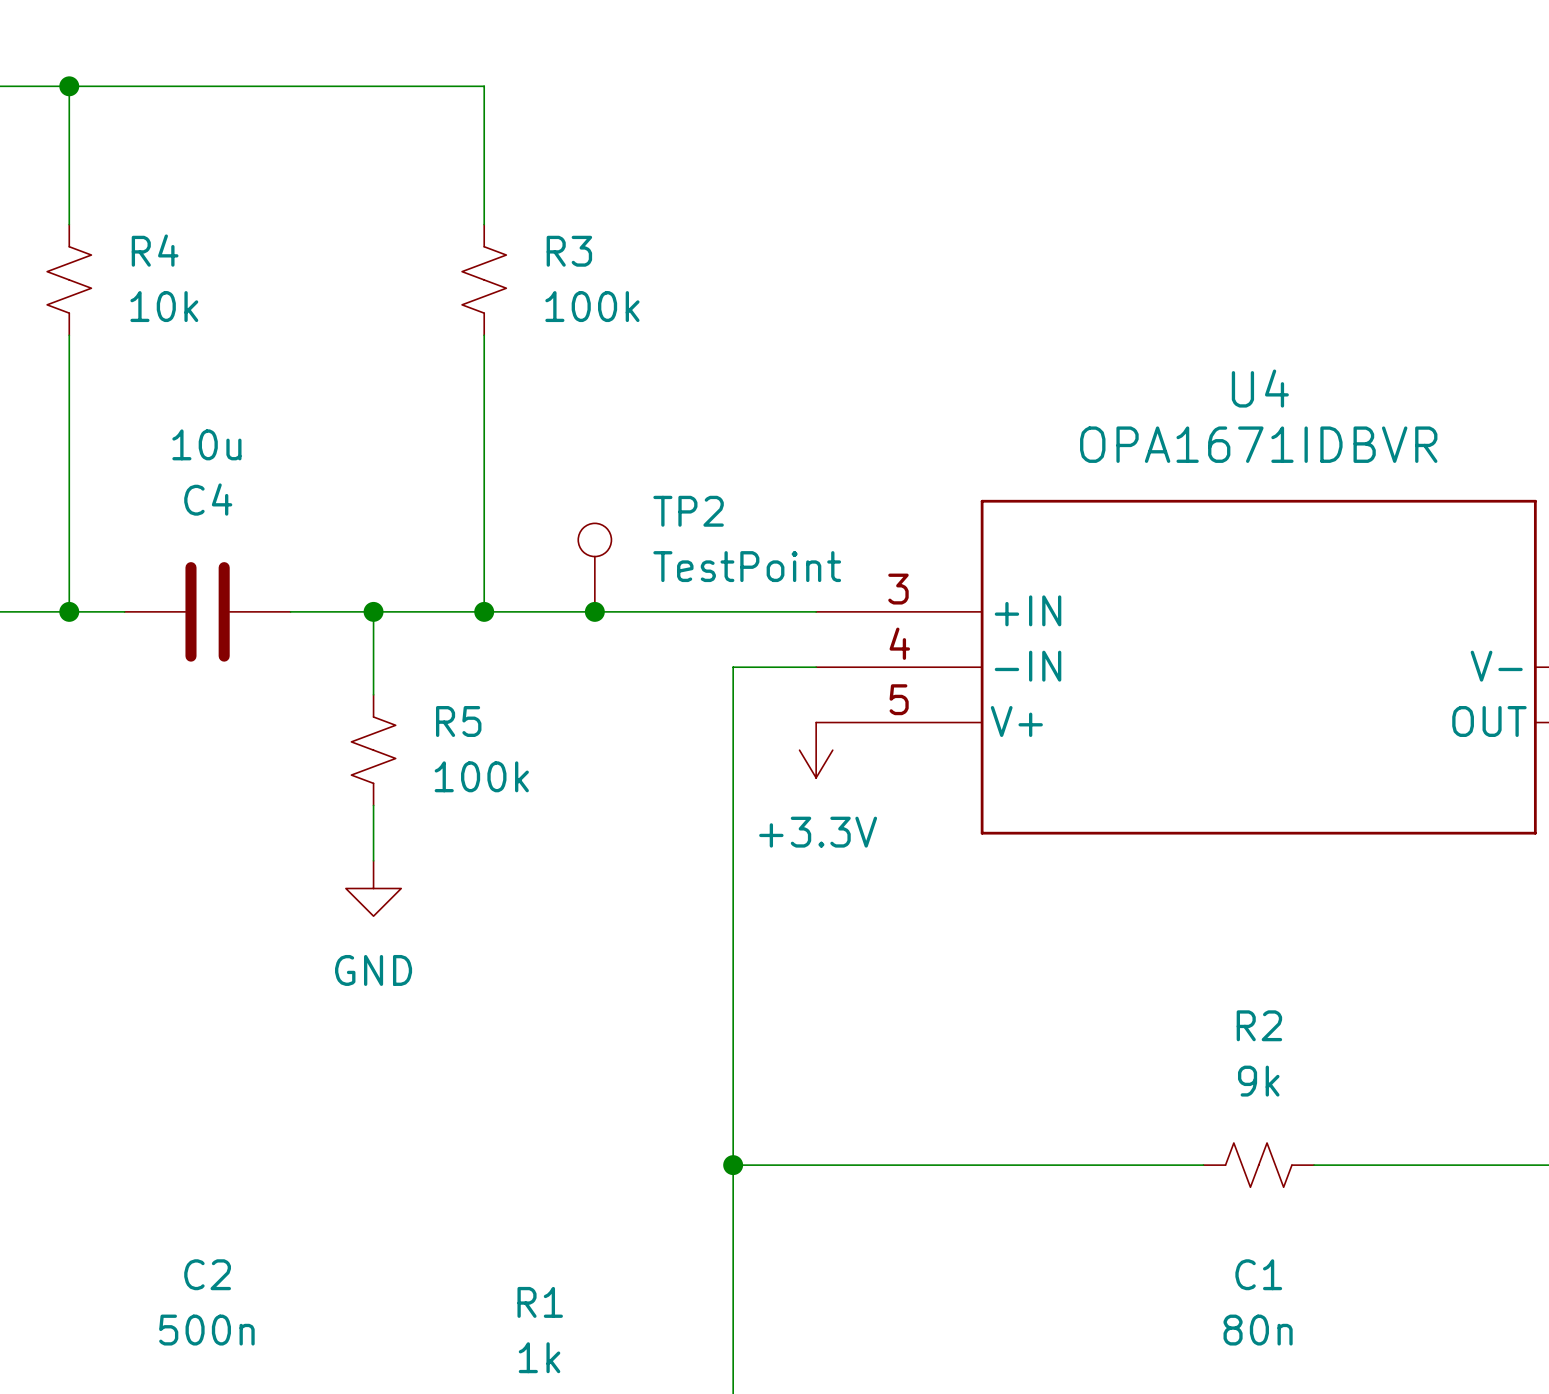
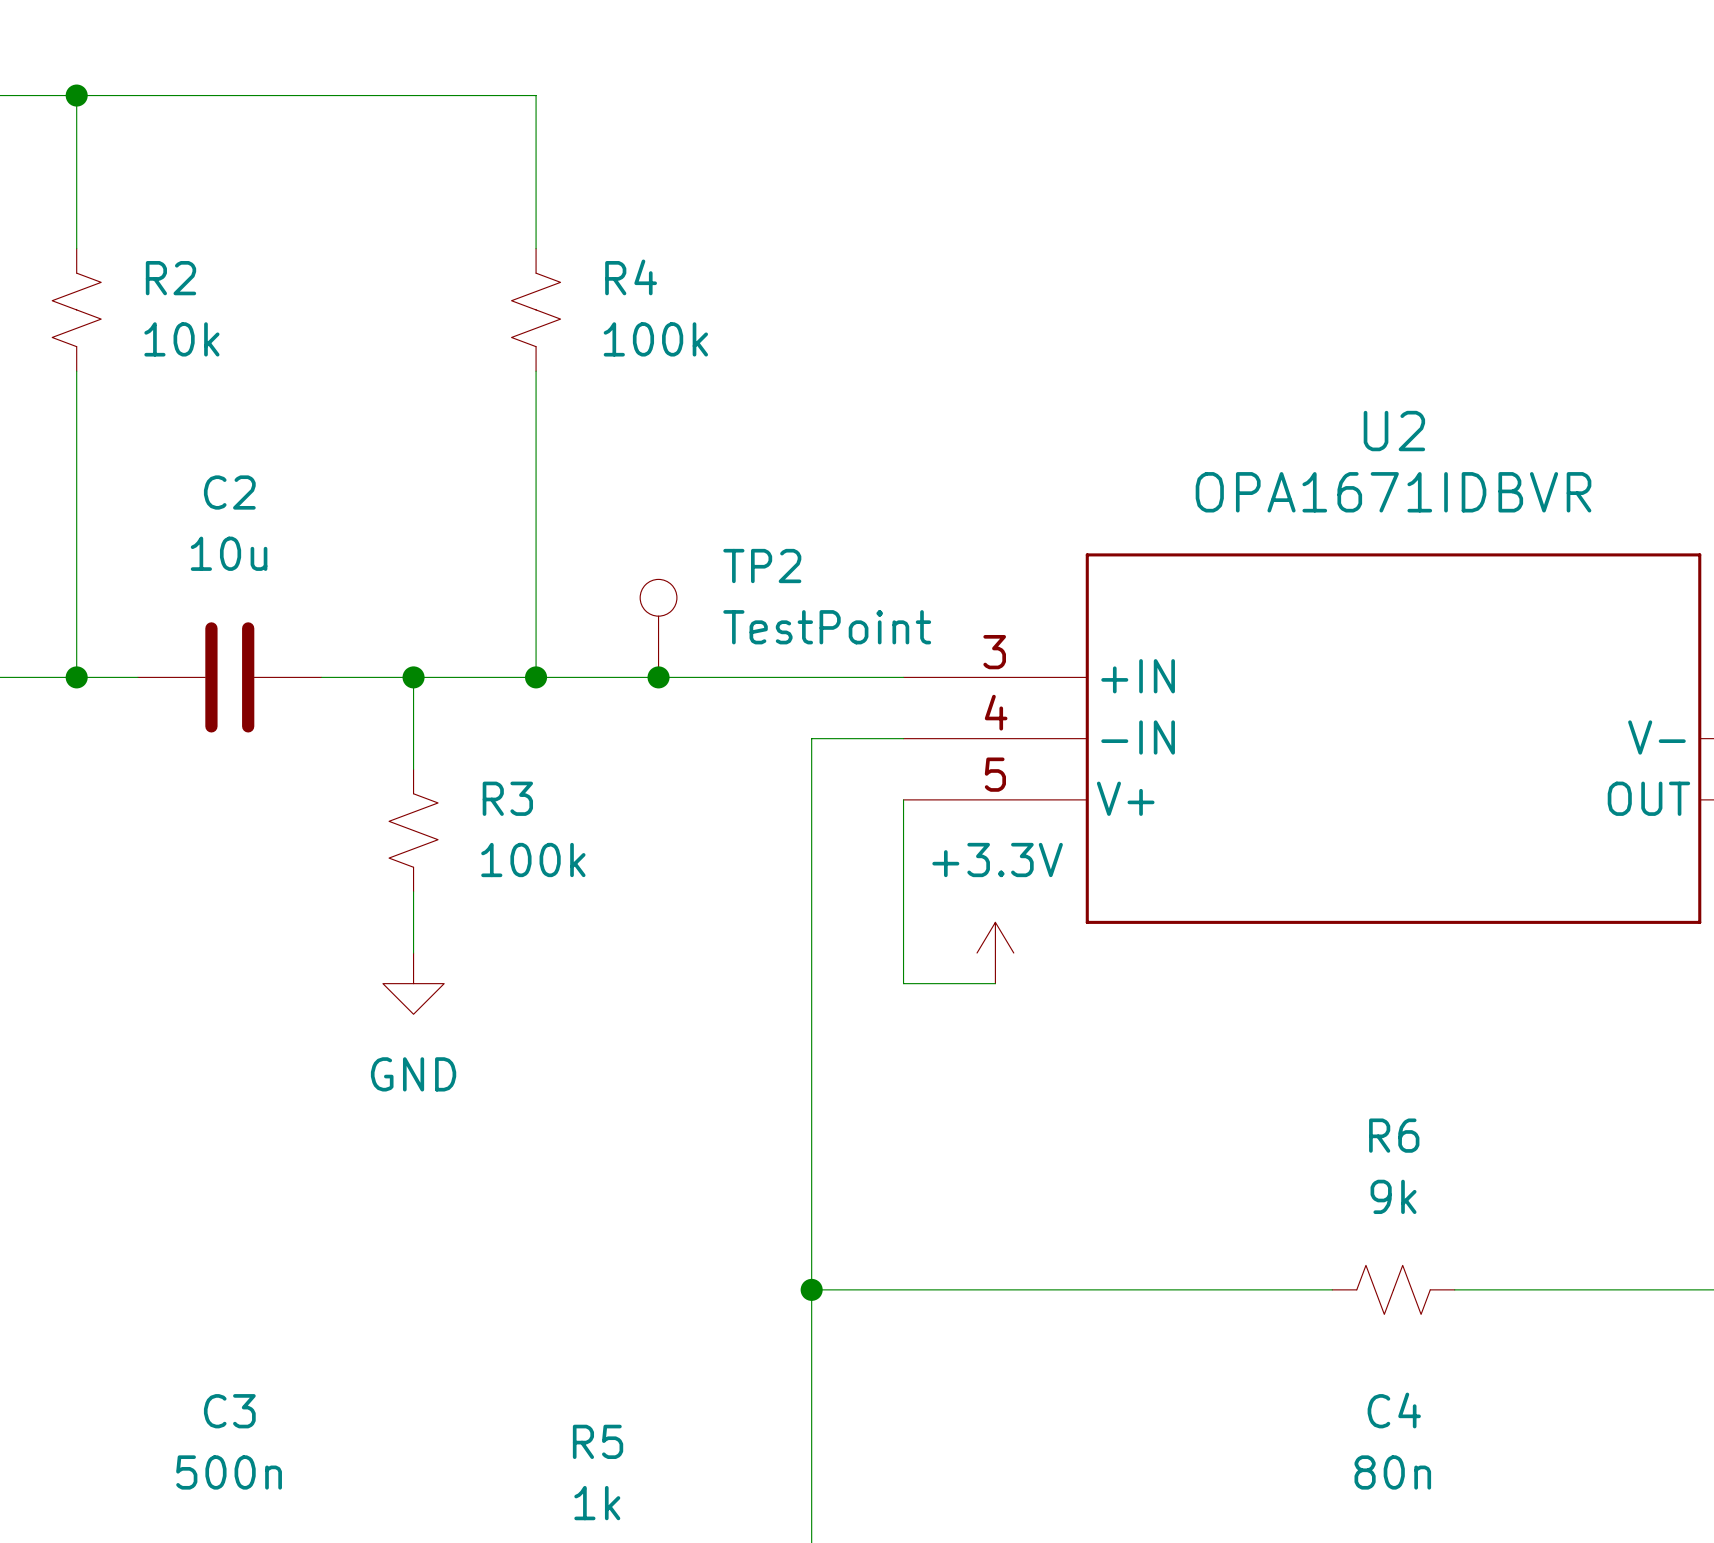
R4 name: R4 (155, 250) -> R2 (170, 278)
R3 name: R3 (569, 251) -> R4 (631, 277)
U4 name: U4 (1260, 388) -> U2 (1394, 431)
10u name: 10u (206, 444) -> C2 (229, 492)
10u value: C4 (208, 499) -> 10u (229, 553)
R5 name: R5 (458, 721) -> R3 (507, 798)
wire: none -> (903, 799) (903, 983) (995, 983)
power symbol rotation: 0° (816, 750) -> 180° (995, 953)
power symbol position: +3.3V (816, 750) -> +3.3V (995, 953)
R2 name: R2 (1259, 1025) -> R6 (1394, 1135)
C2 name: C2 (207, 1274) -> C3 (229, 1411)
C1 name: C1 (1258, 1274) -> C4 (1394, 1410)
R1 name: R1 (540, 1302) -> R5 (598, 1441)

